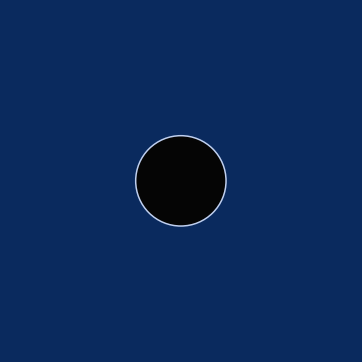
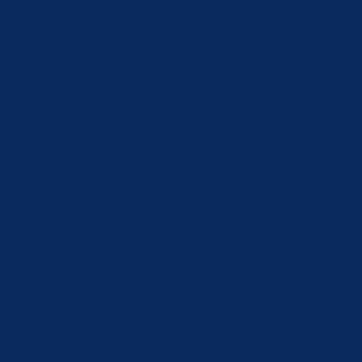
part: (180, 180) -> none

